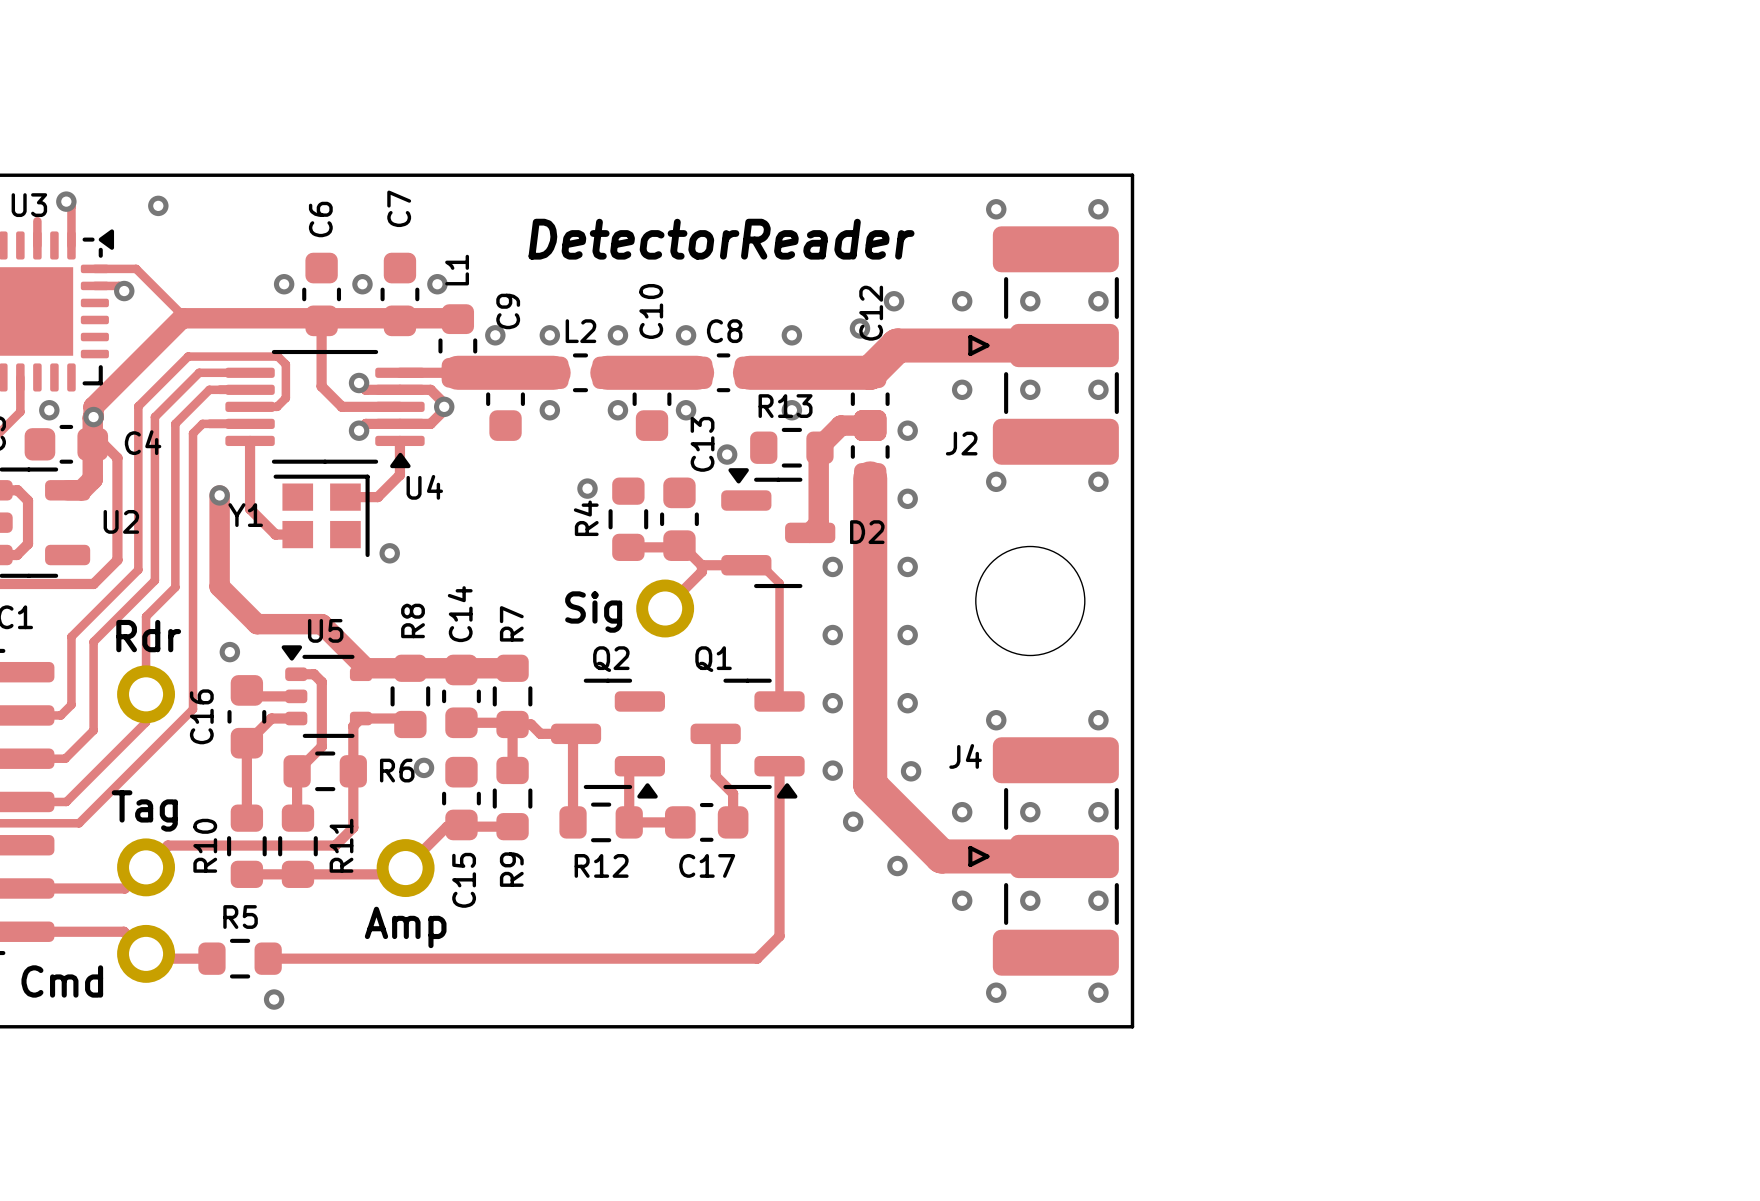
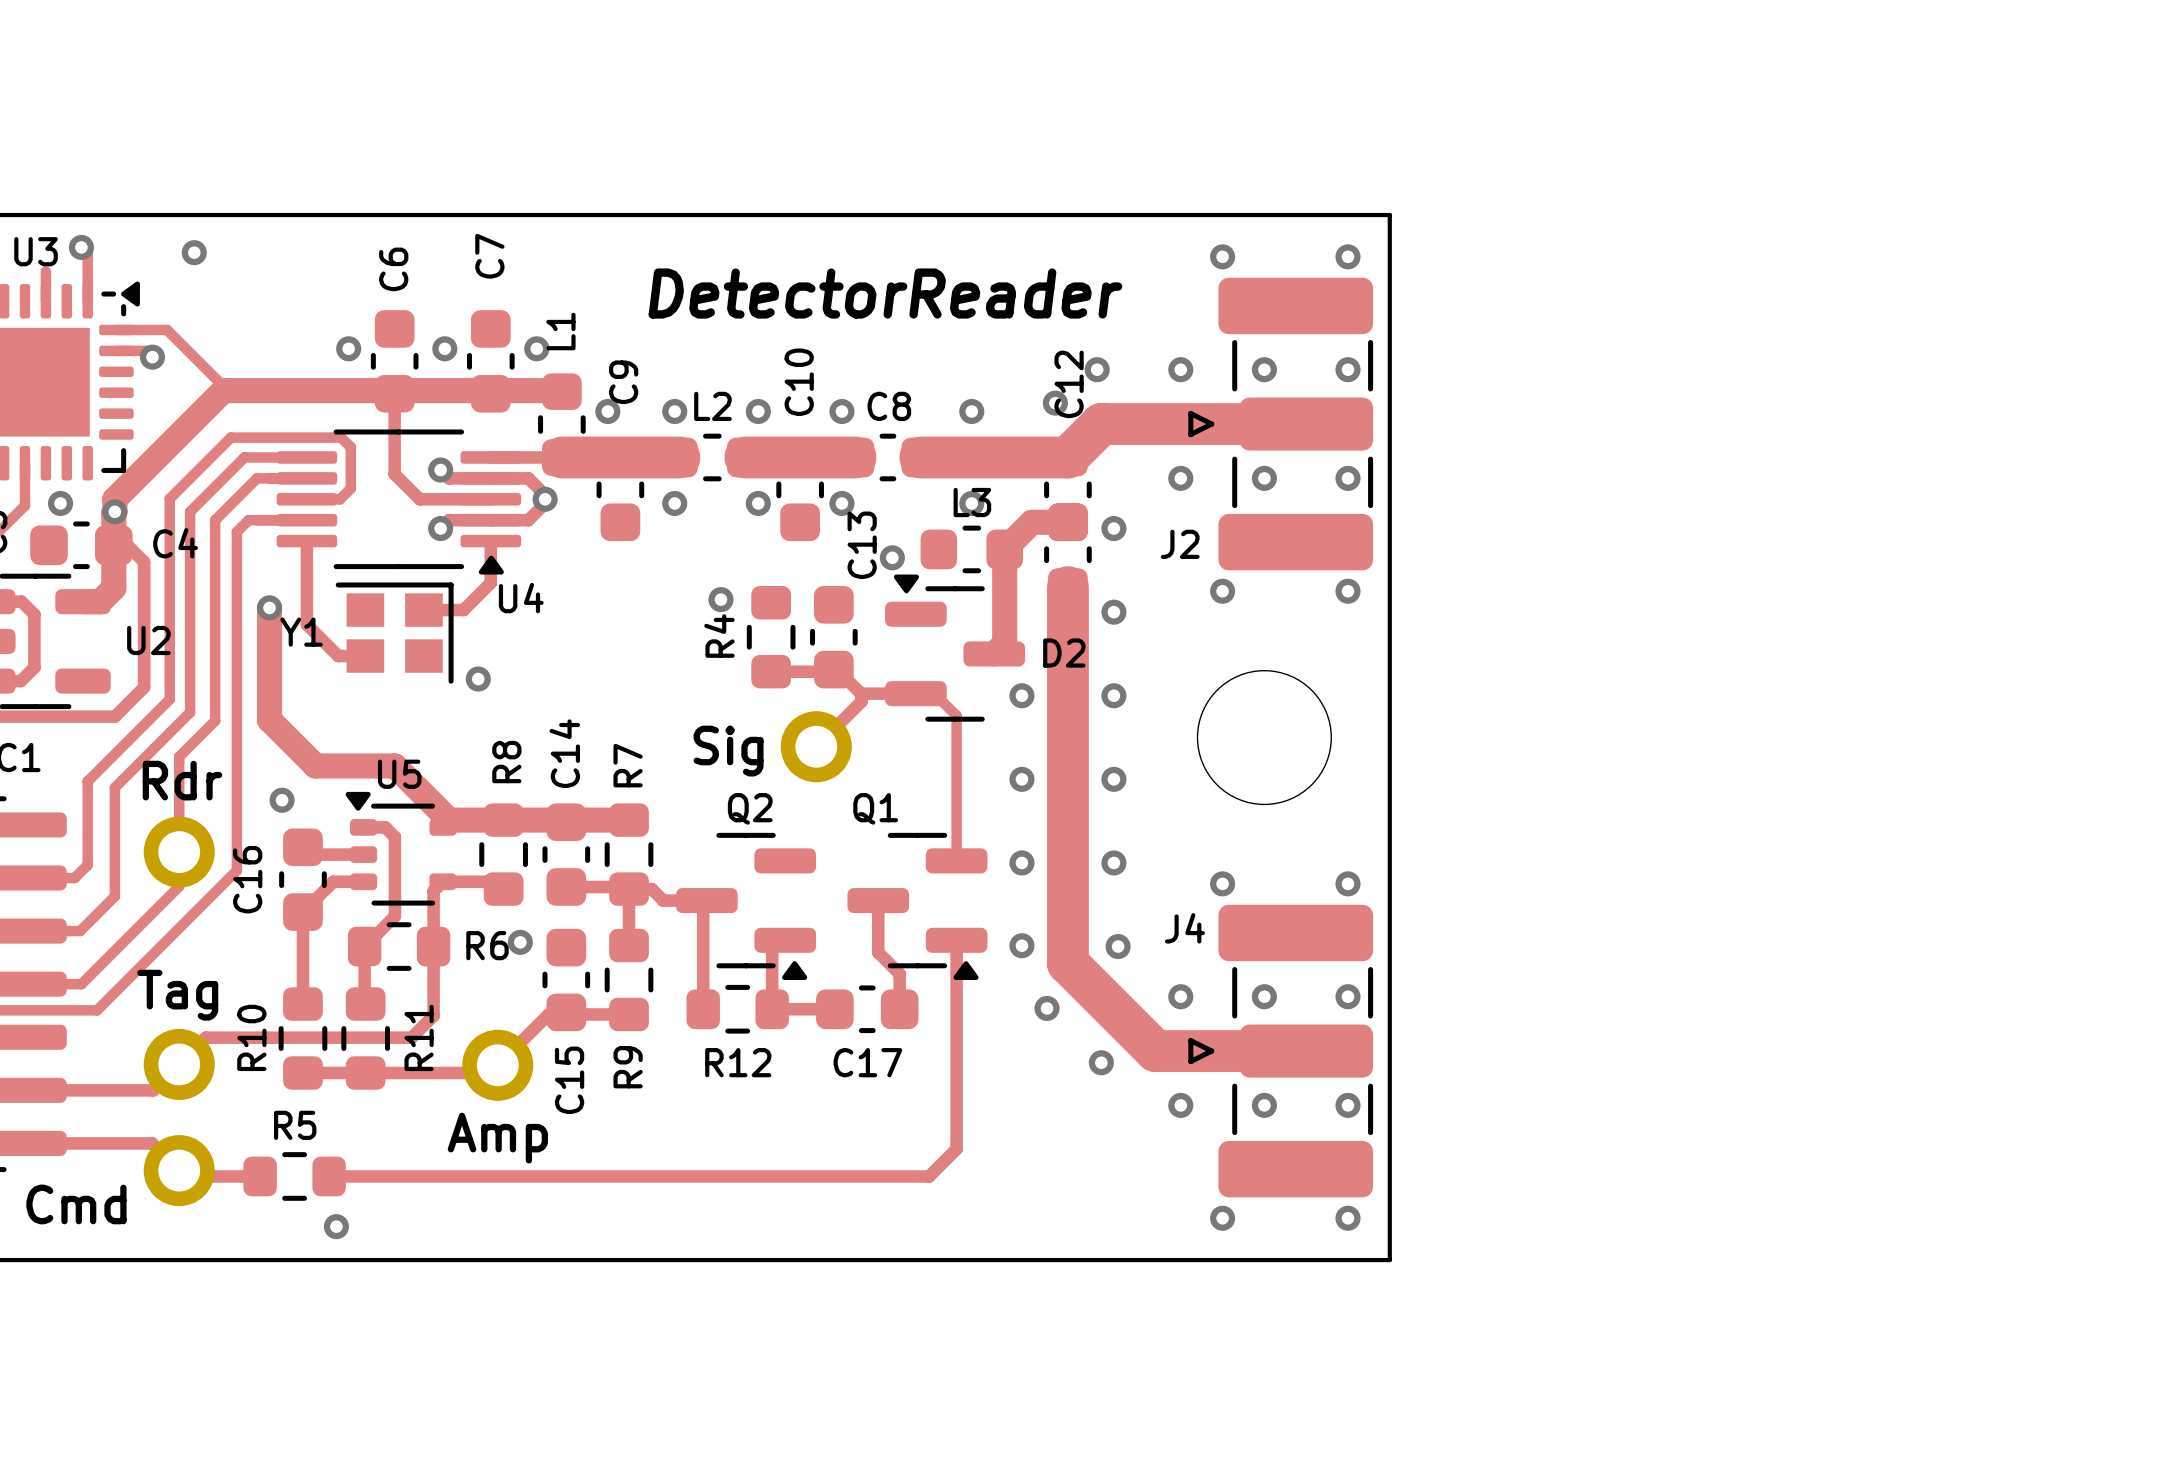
R13: (791, 447) -> none
L3: none -> (971, 549)

